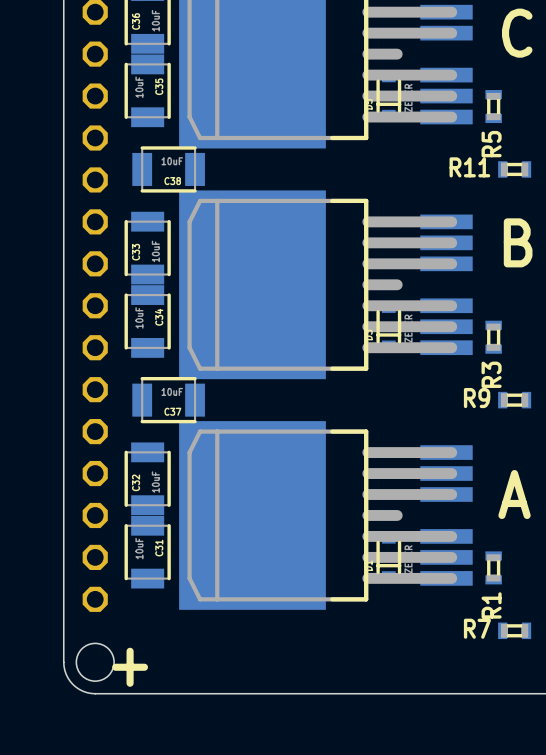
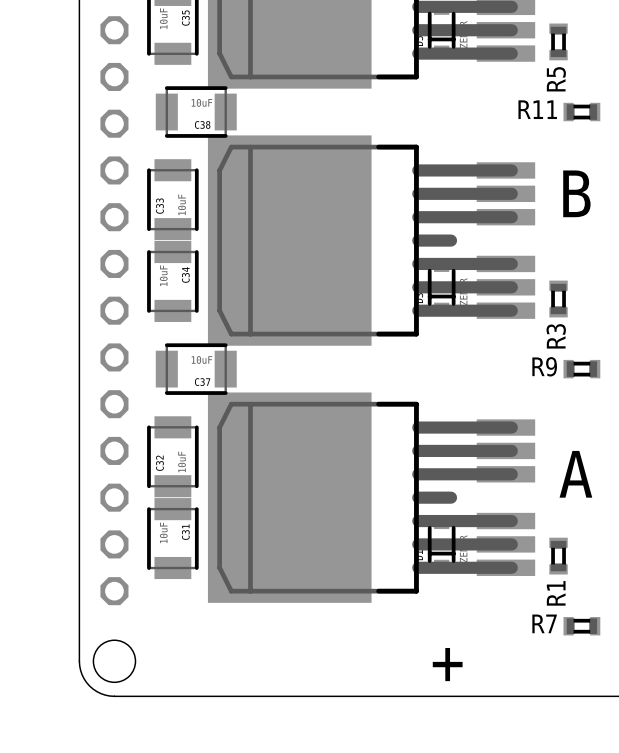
text position: + (130, 667) -> + (447, 664)

